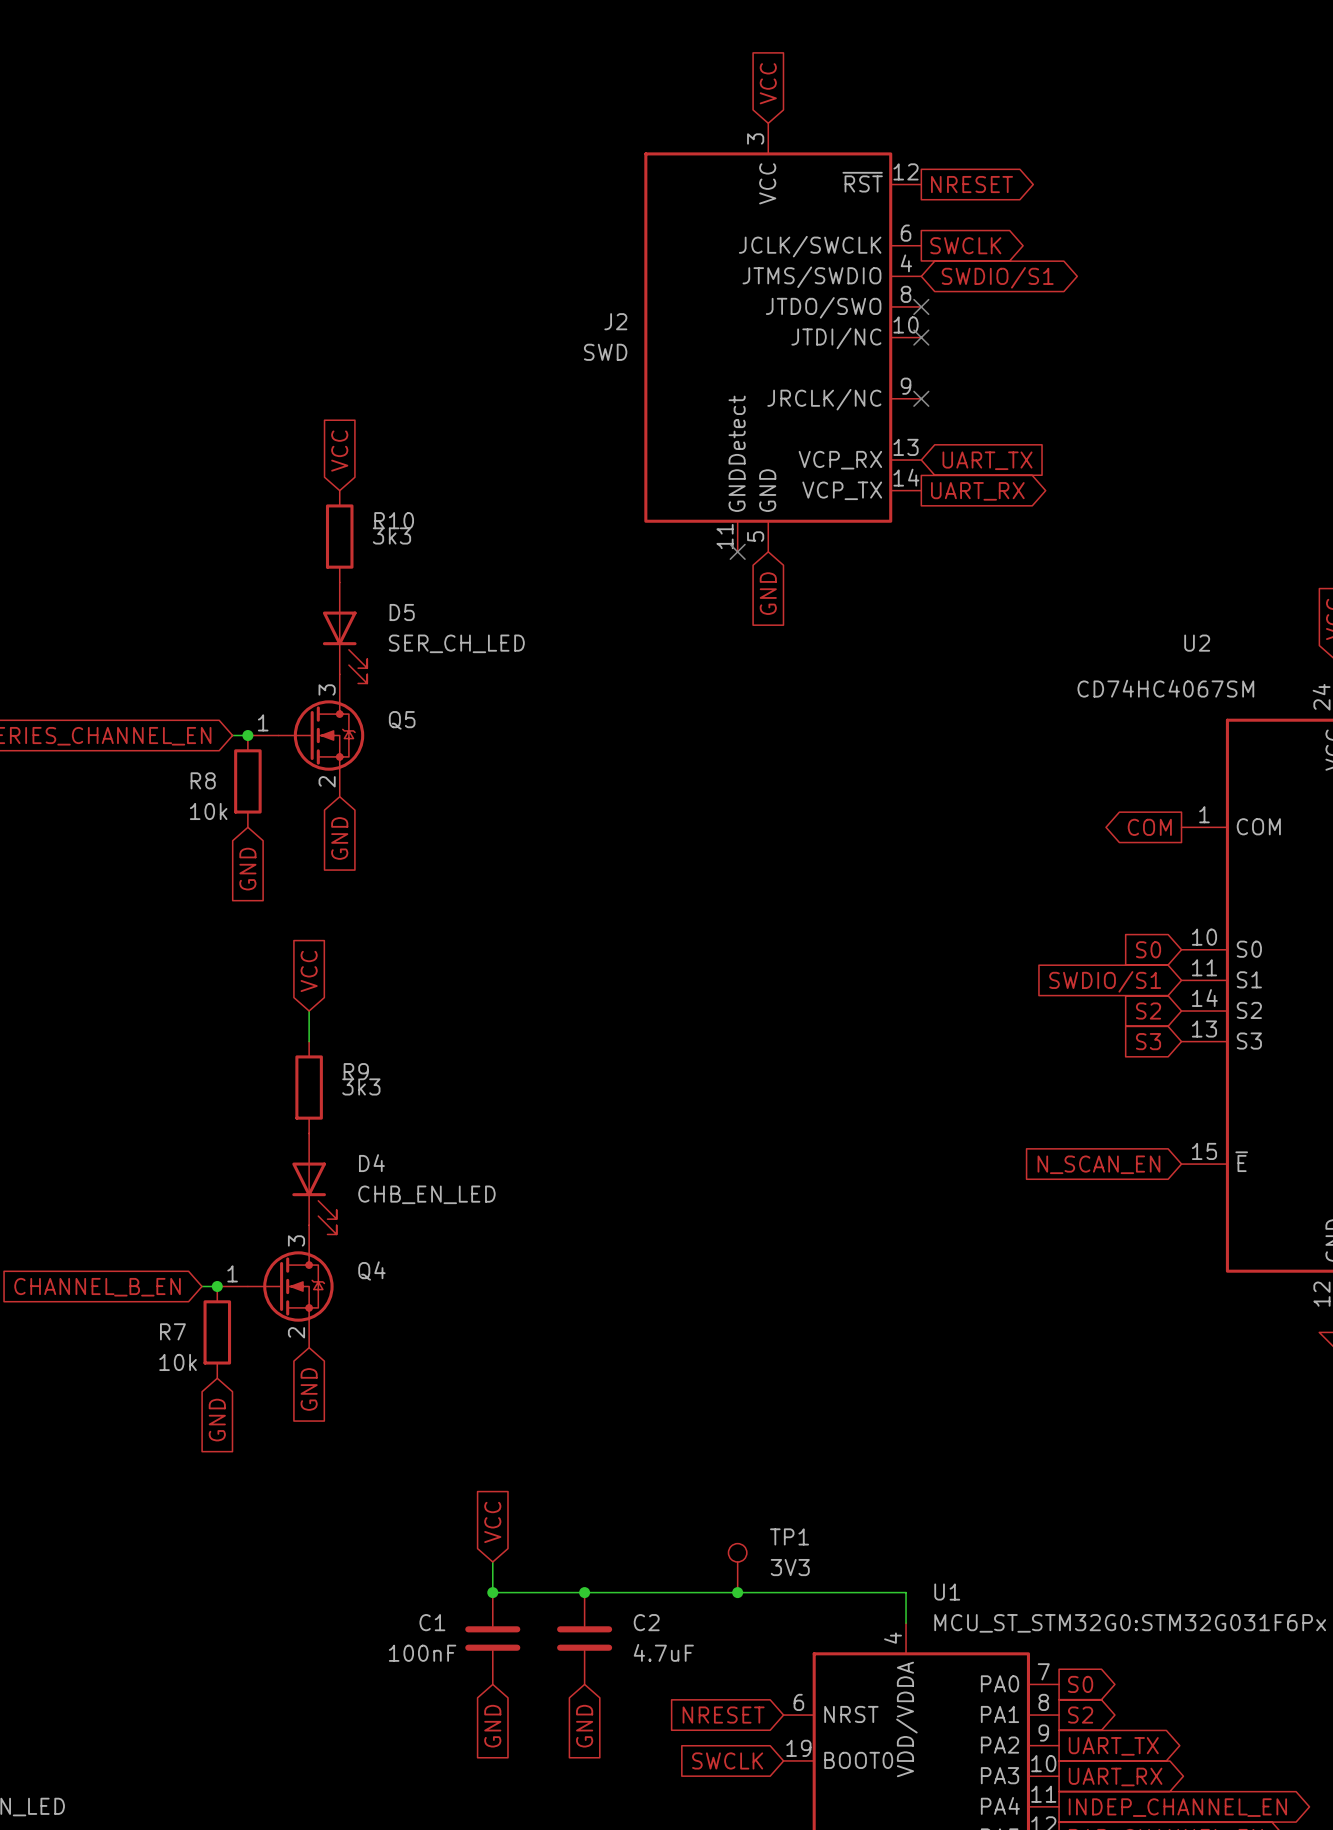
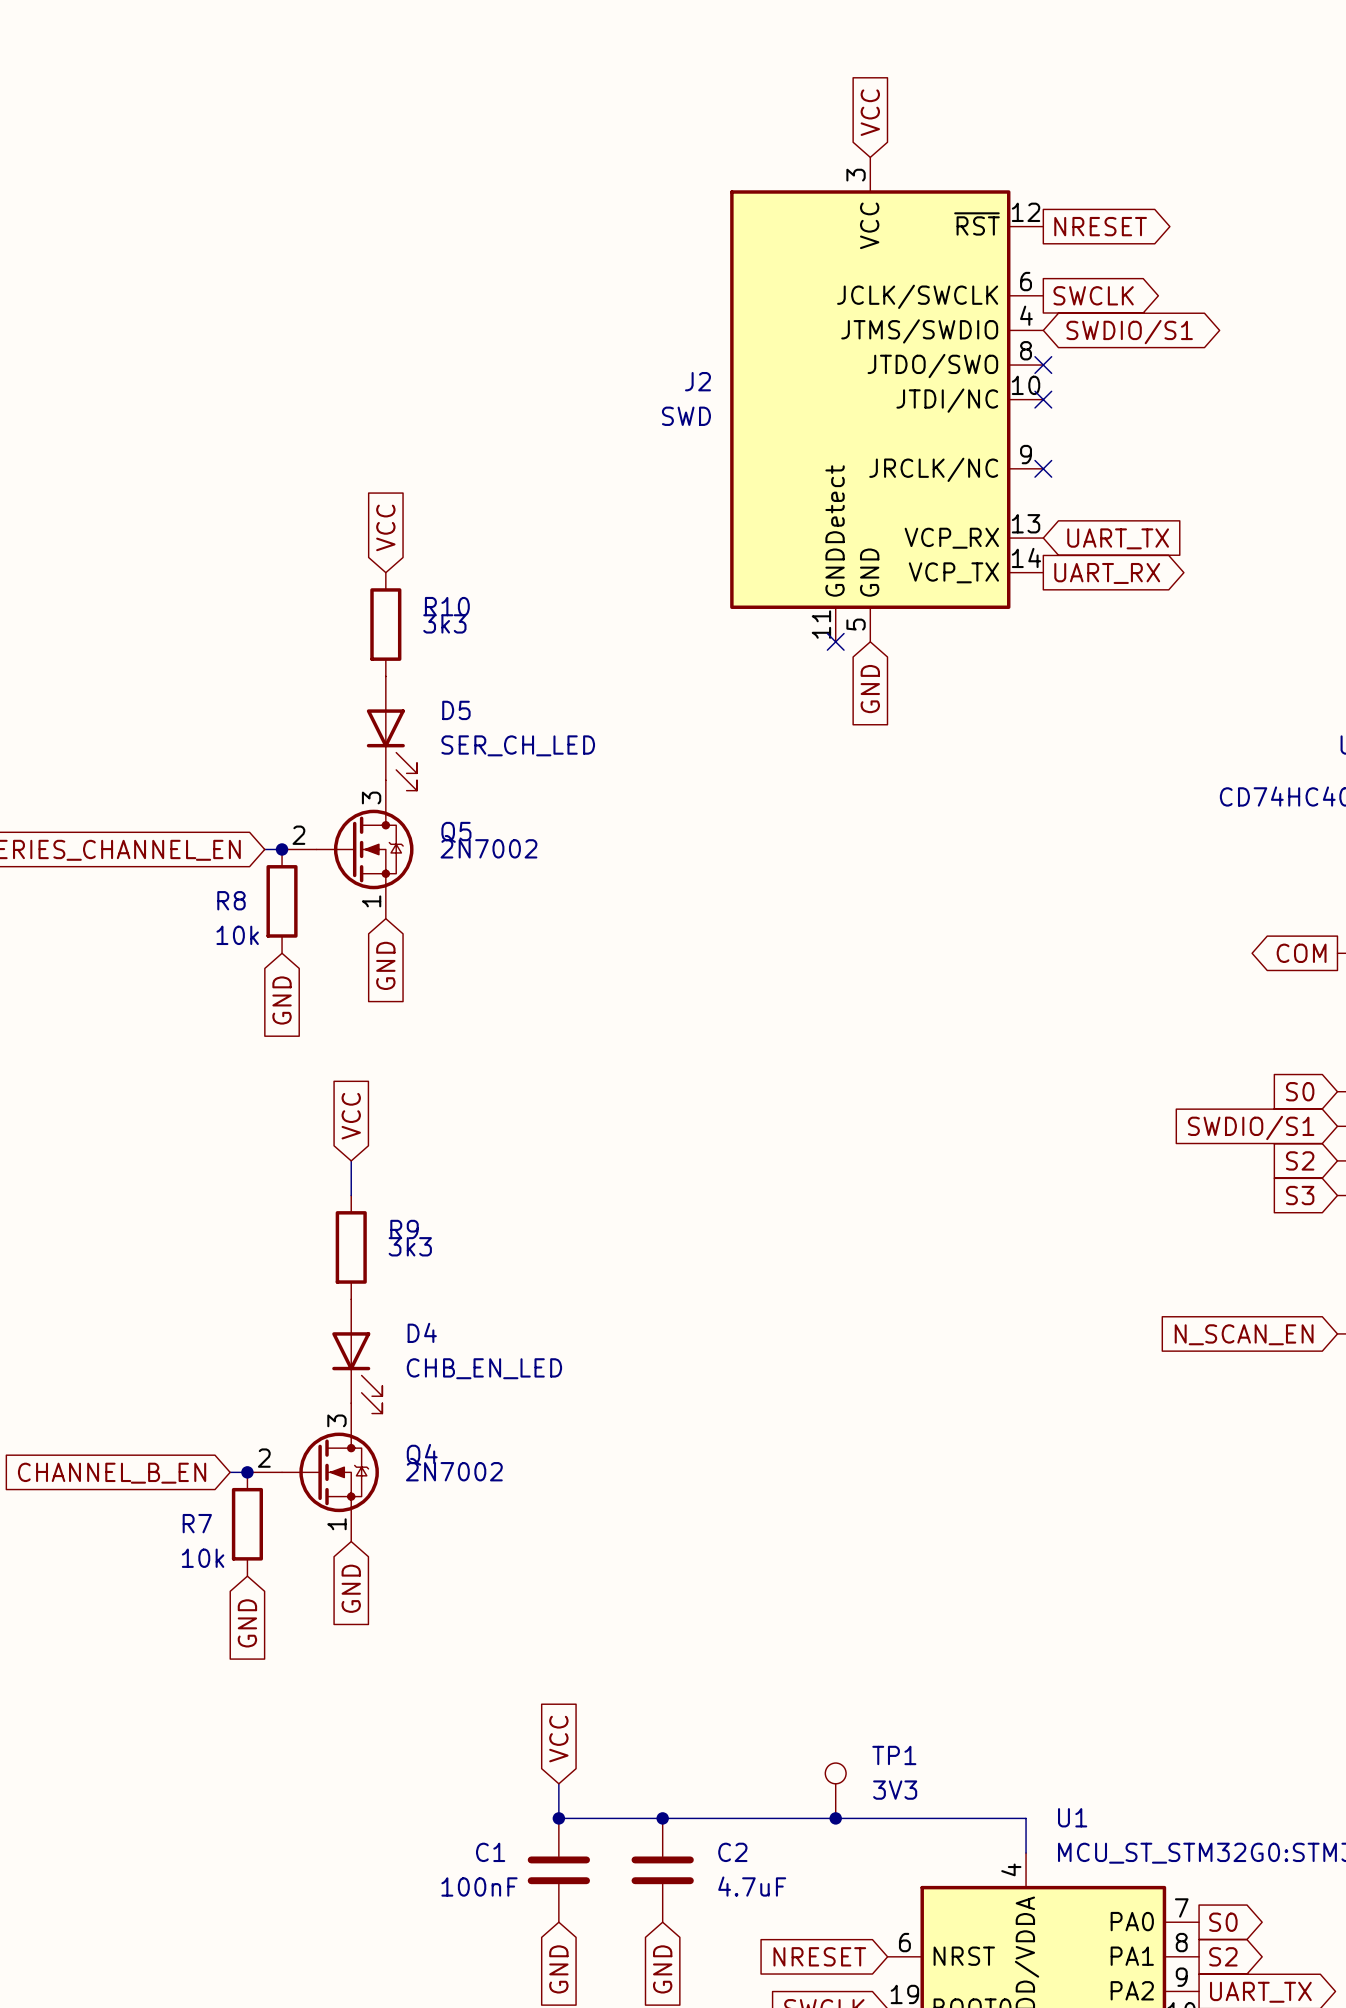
Q5 pin number: 1 (263, 722) -> 2 (298, 835)
Q5 value: none -> 2N7002 (488, 848)
Q5 pin number: 2 (327, 781) -> 1 (371, 901)
Q4 pin number: 1 (232, 1273) -> 2 (264, 1458)
Q4 value: none -> 2N7002 (454, 1471)
Q4 pin number: 2 (296, 1332) -> 1 (336, 1524)

